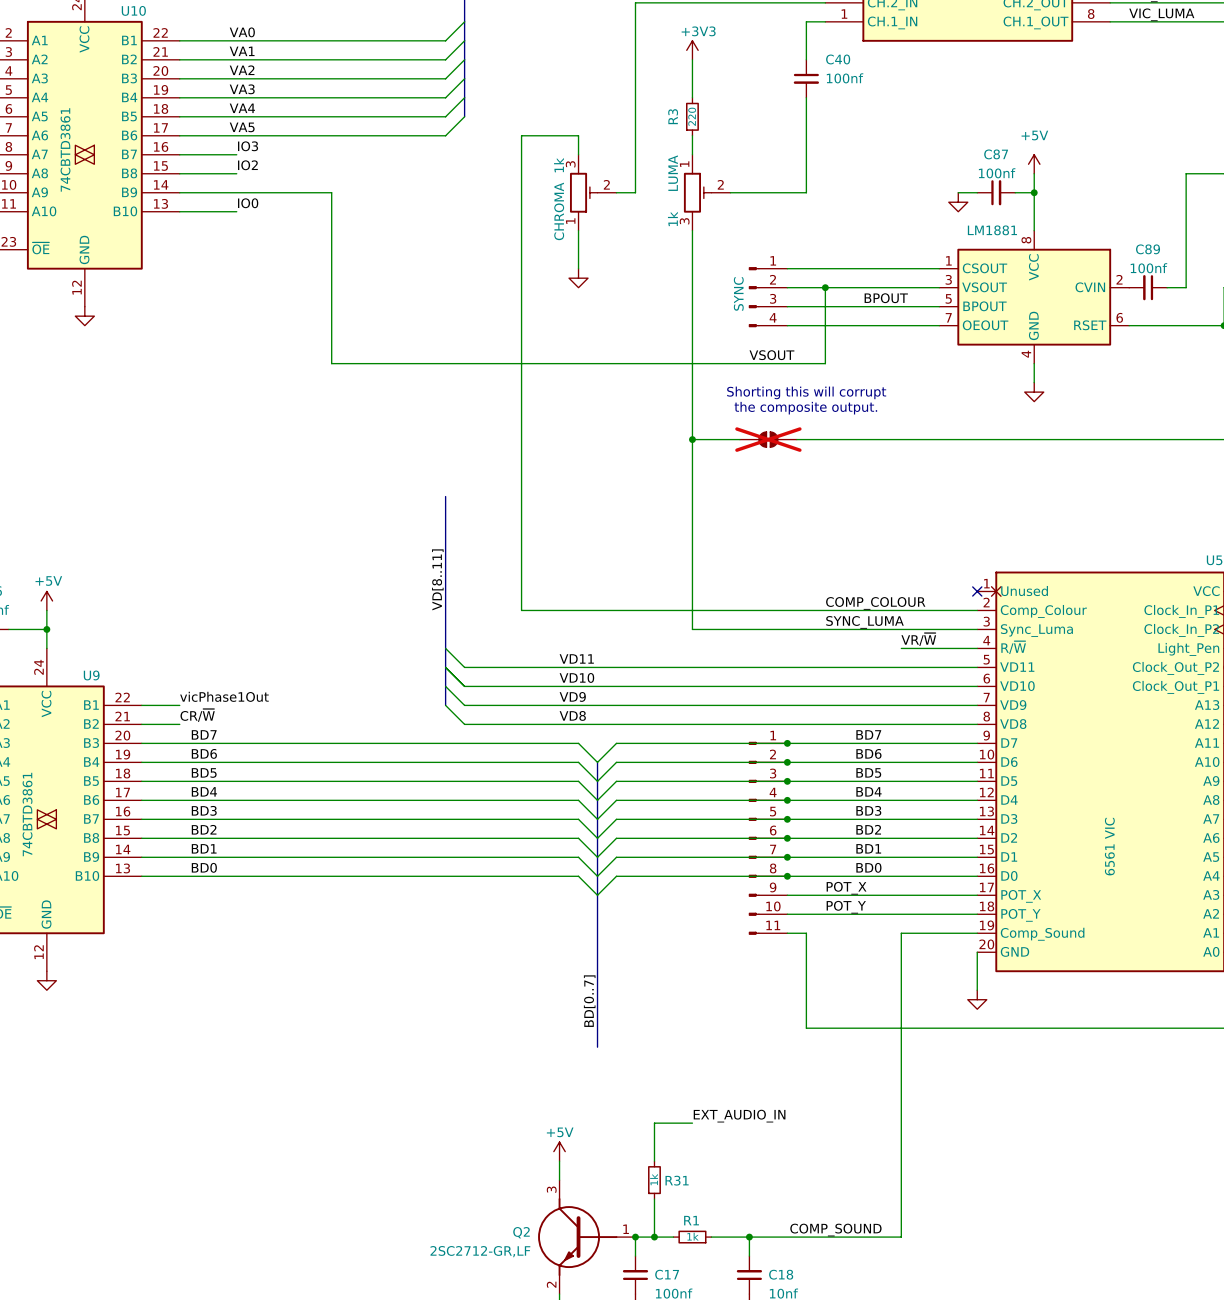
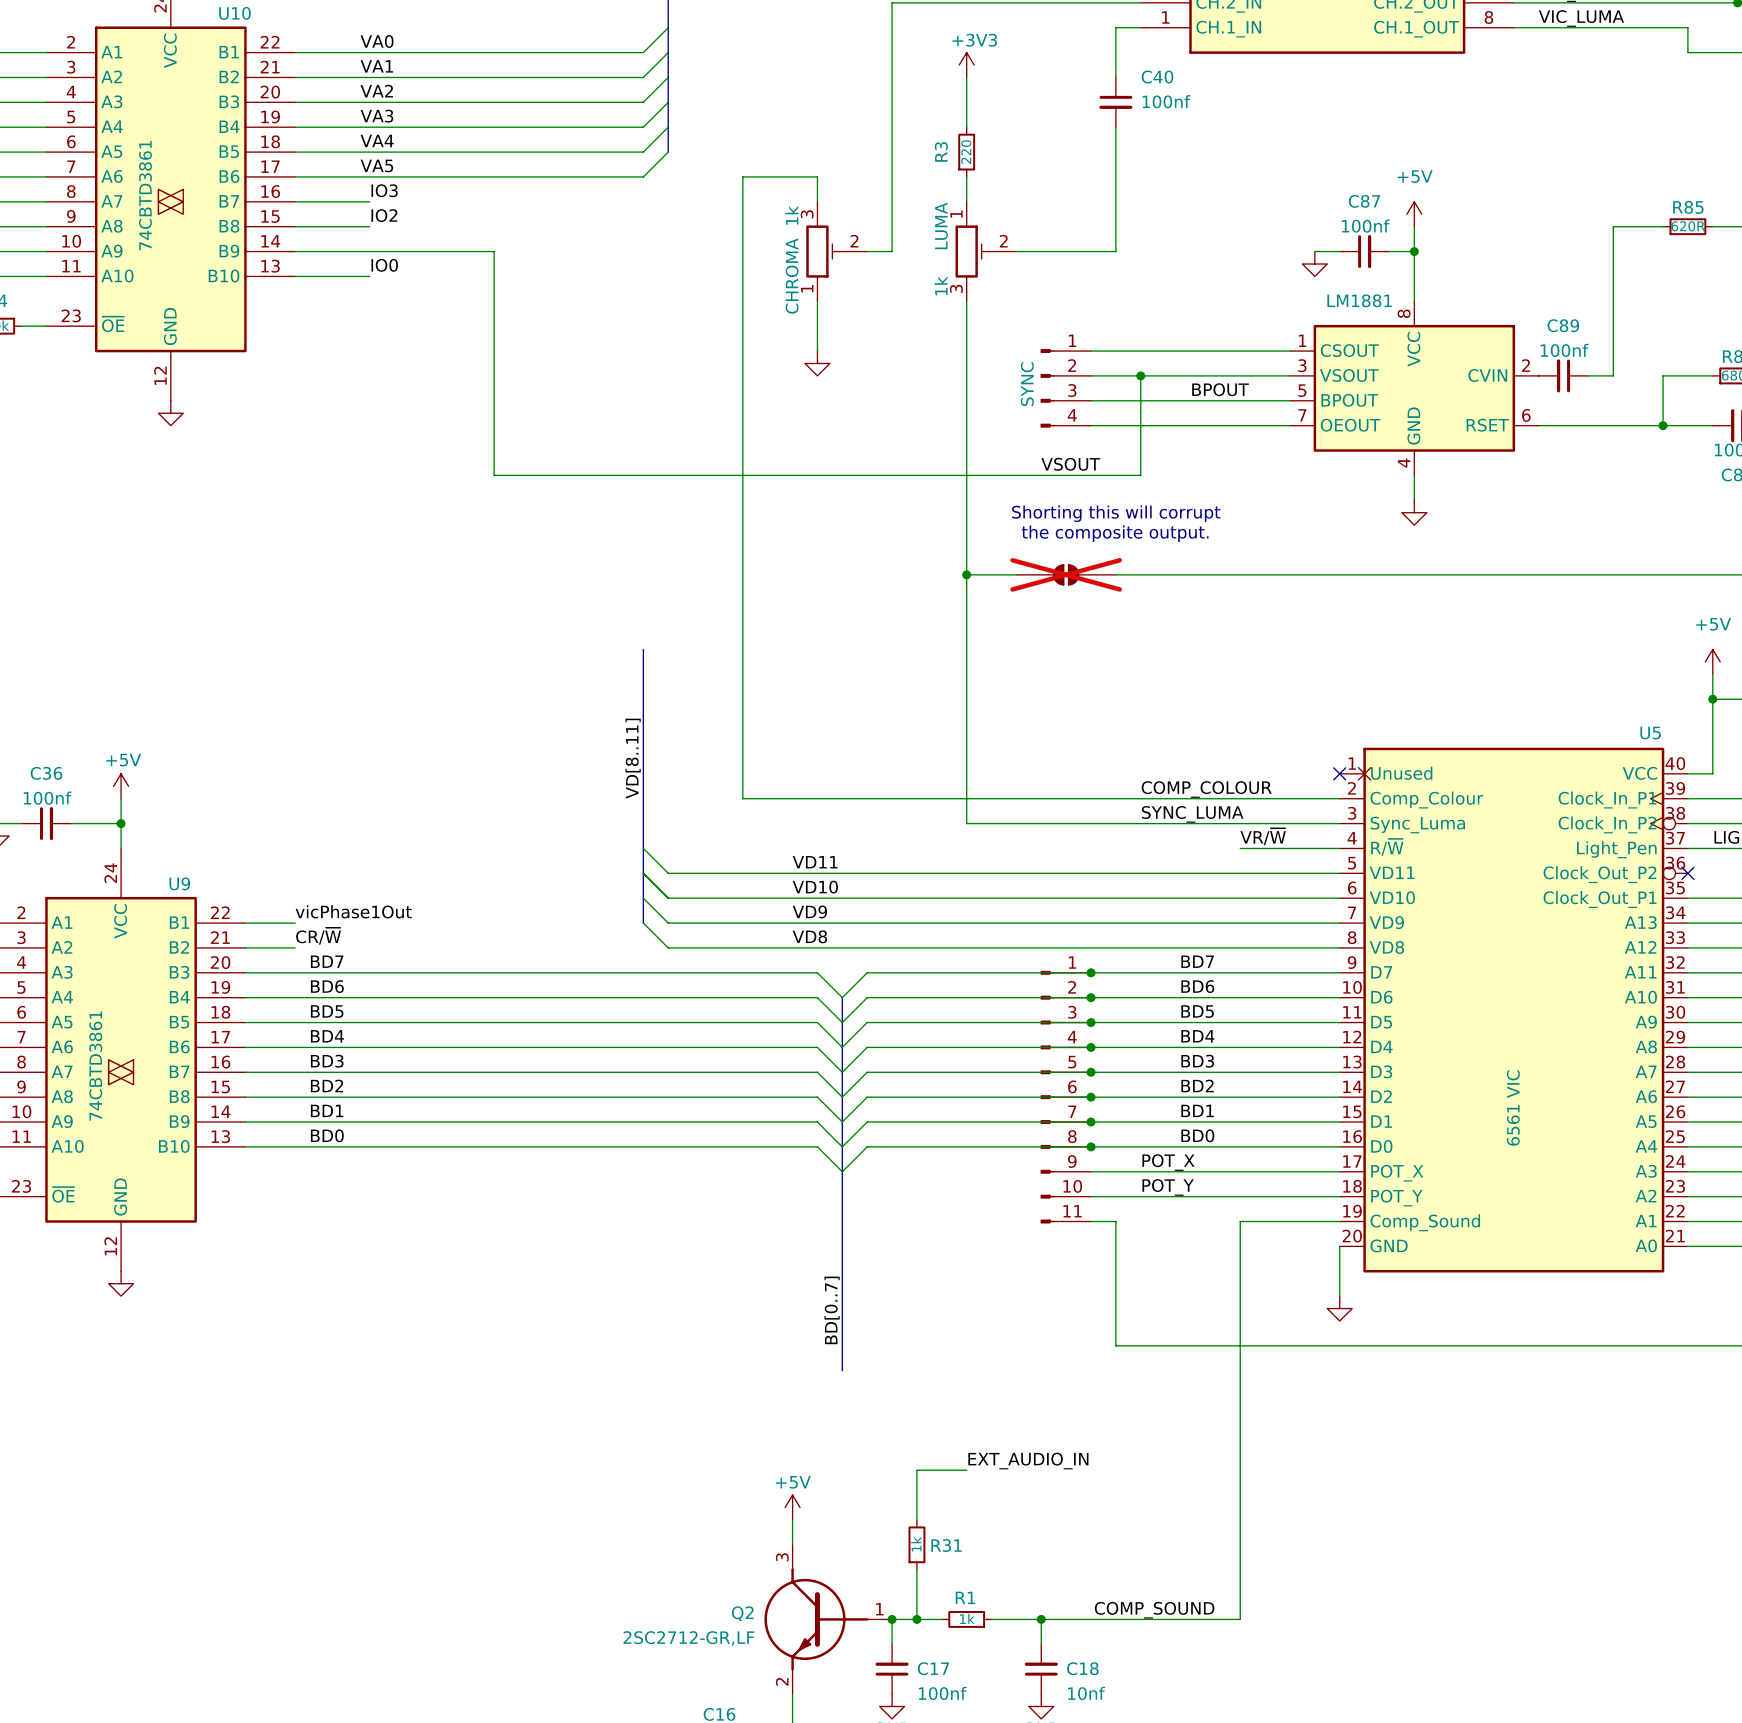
part symbol: [739, 431, 797, 448] -> [1016, 564, 1116, 586]

